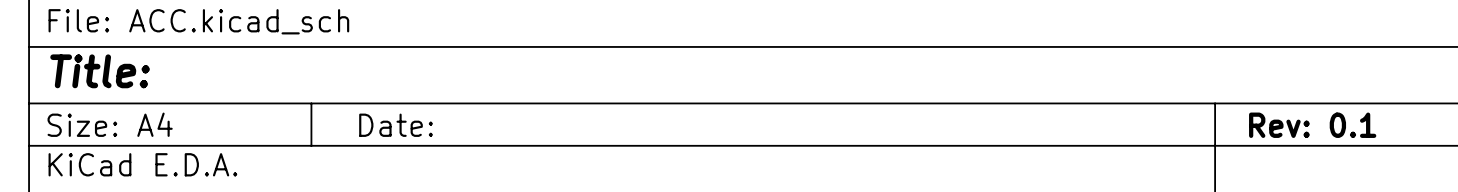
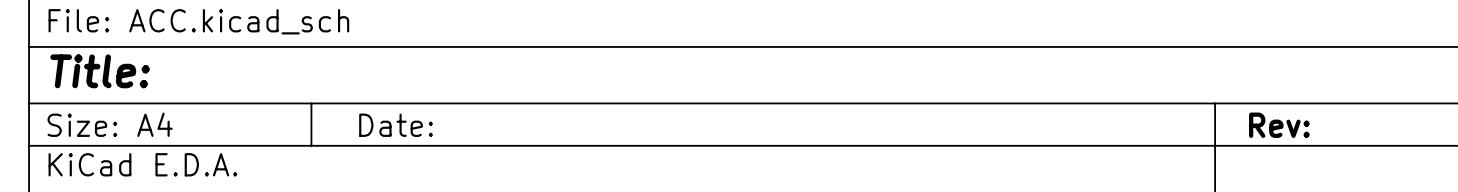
title block: Rev: 0.1 (1312, 125) -> Rev: (1279, 125)

